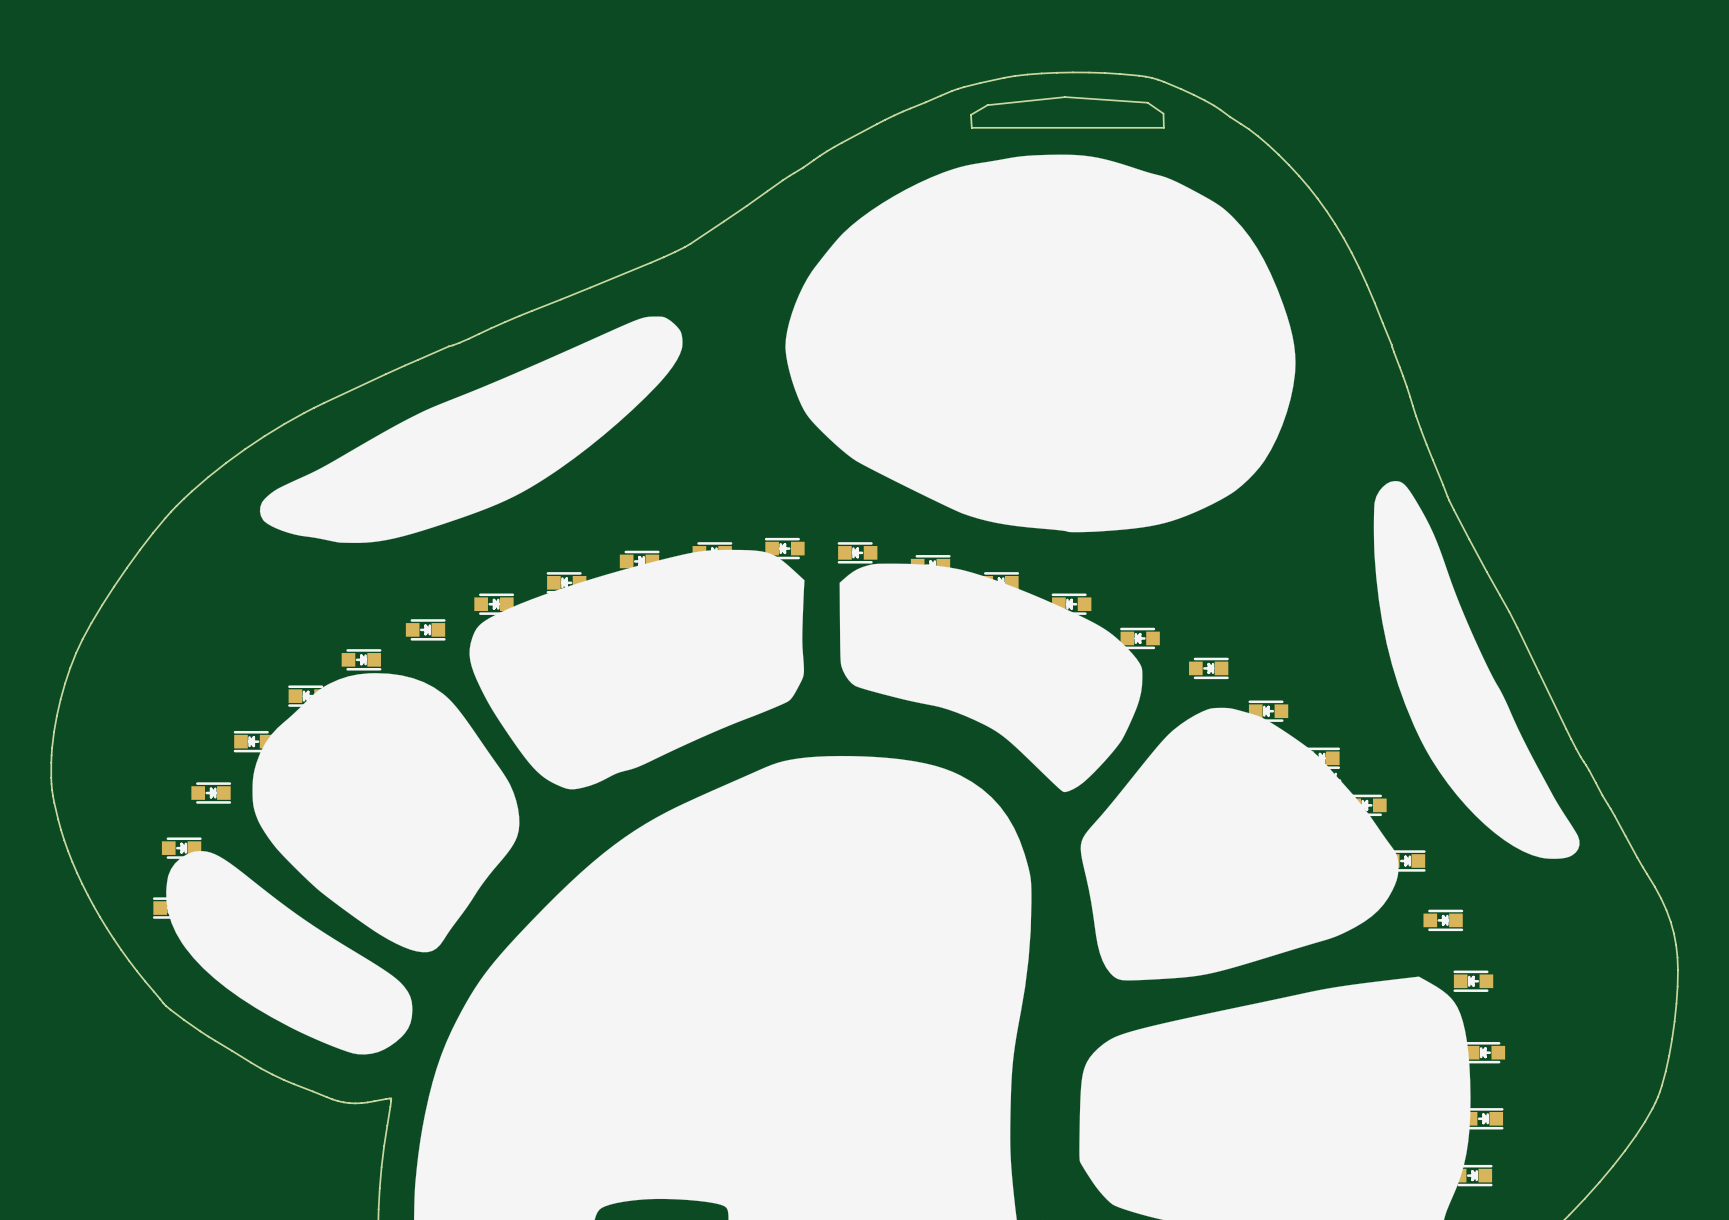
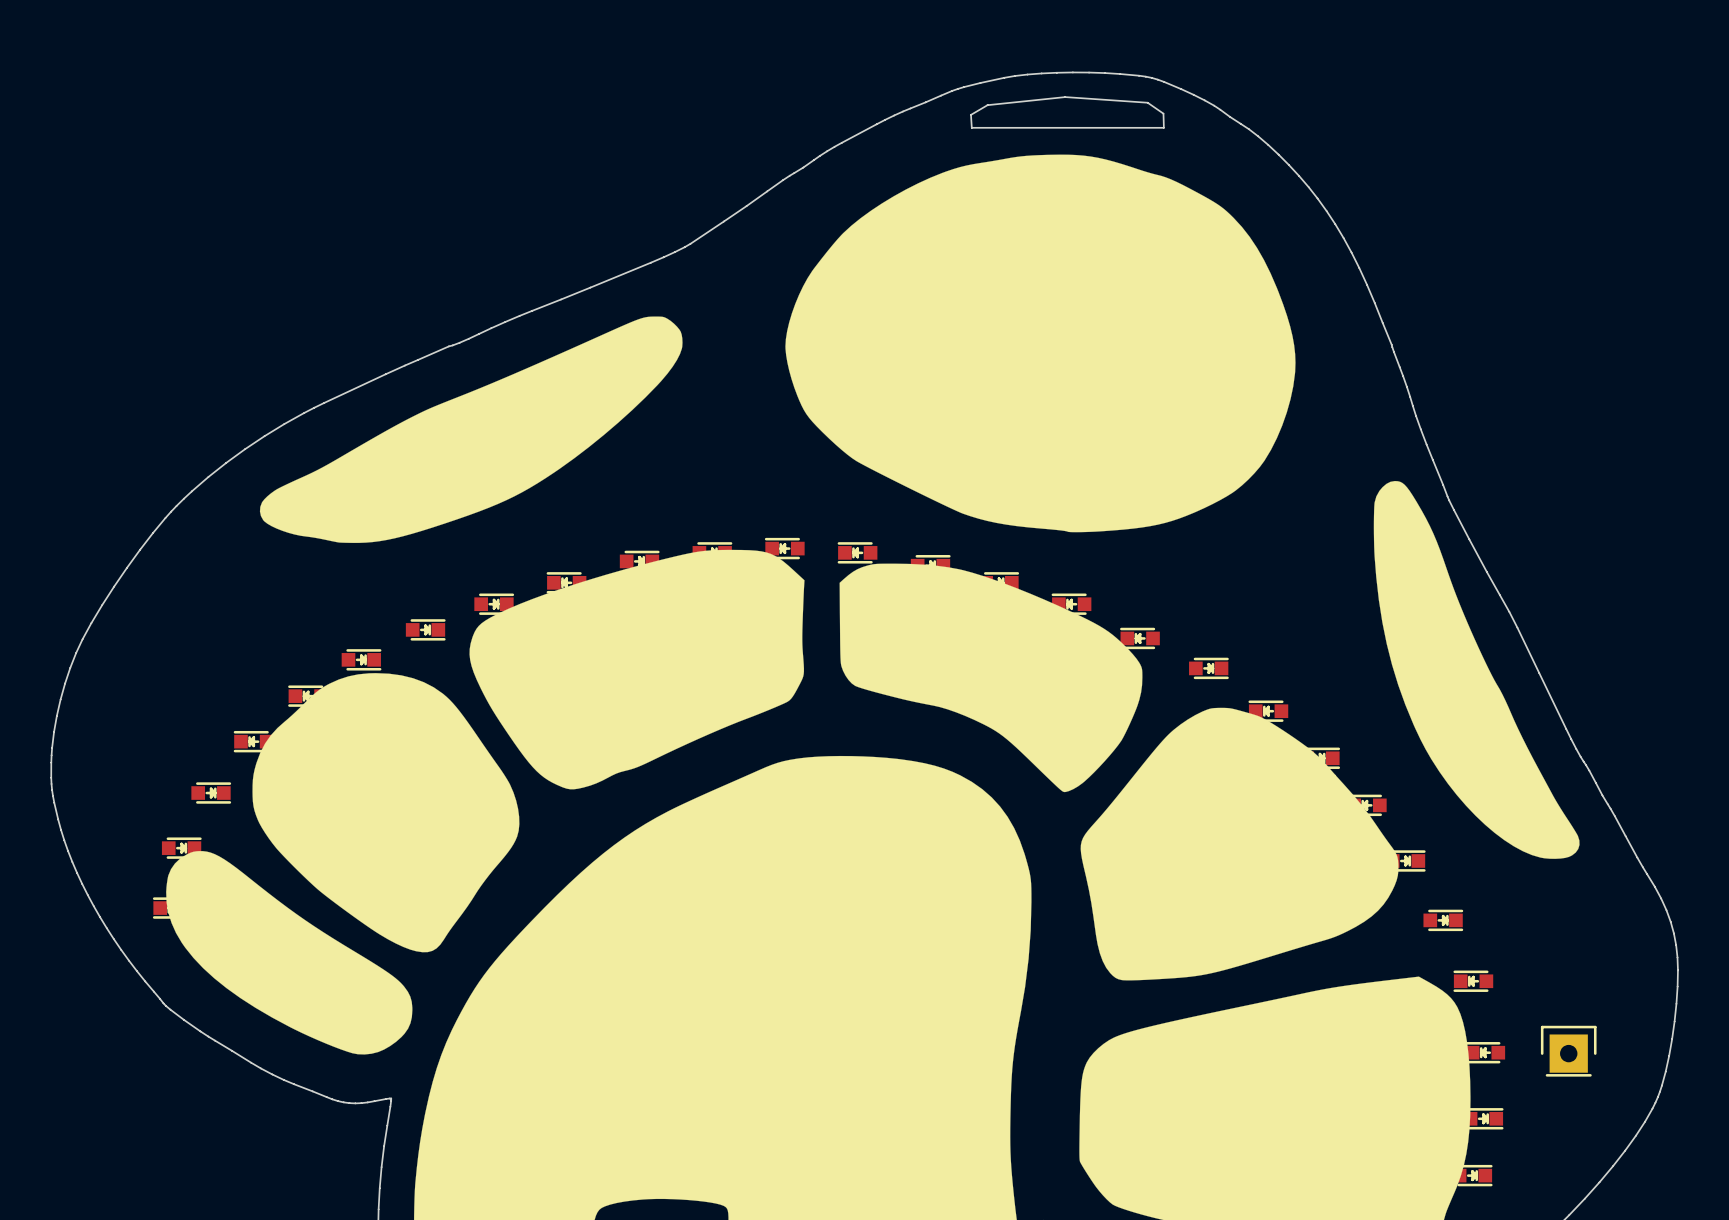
part: none -> (1568, 1051)

